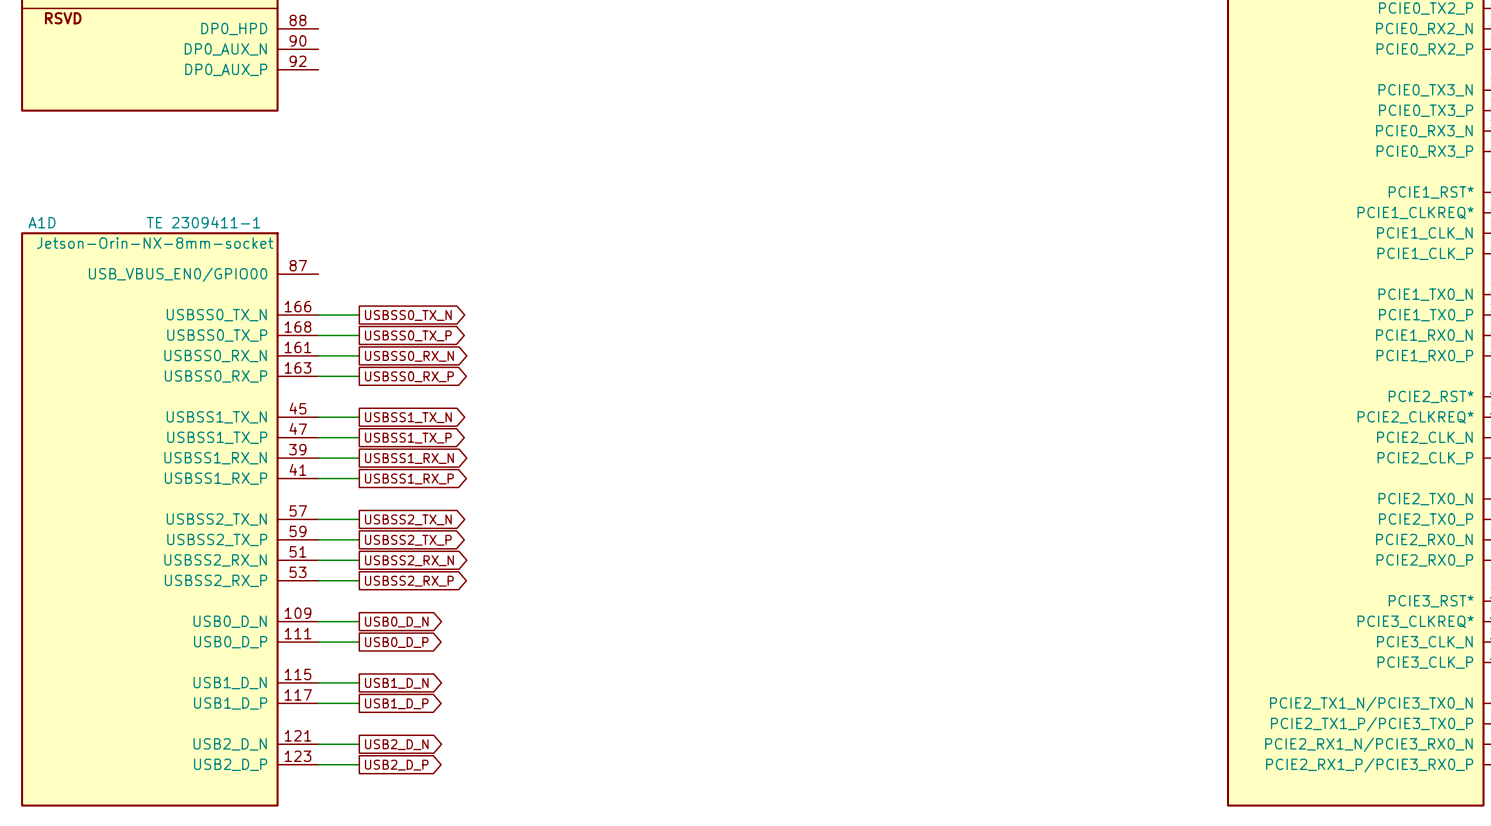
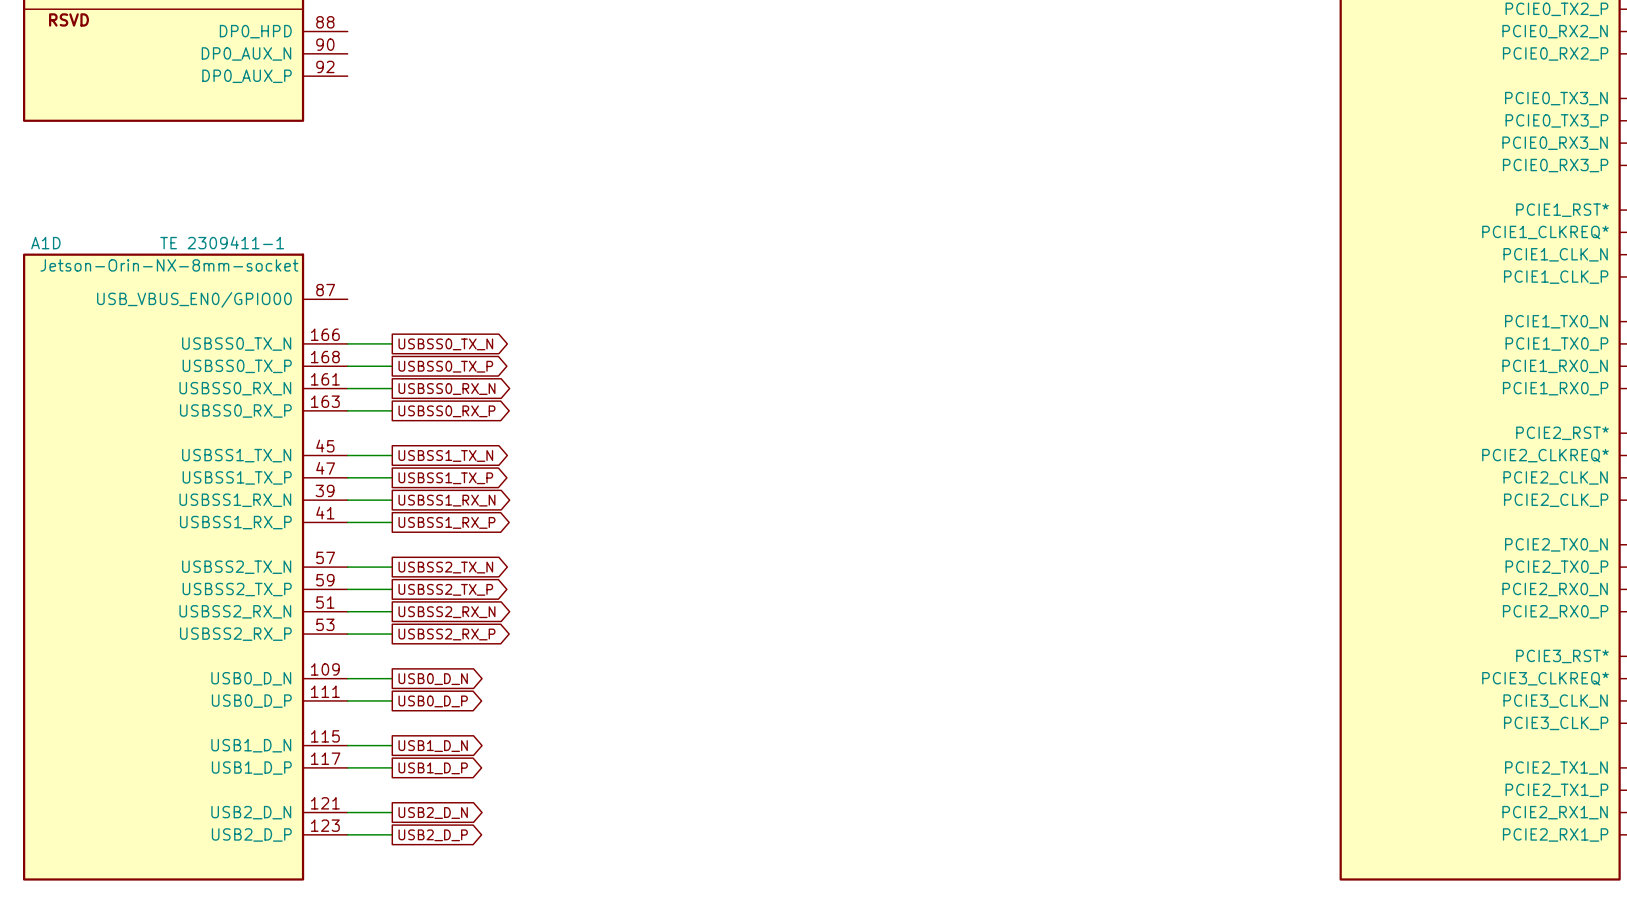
part pin name: PCIE2_TX1_N/PCIE3_TX0_N (1371, 703) -> PCIE2_TX1_N (1556, 768)
part pin name: PCIE2_TX1_P/PCIE3_TX0_P (1372, 724) -> PCIE2_TX1_P (1556, 790)
part pin name: PCIE2_RX1_N/PCIE3_RX0_N (1368, 744) -> PCIE2_RX1_N (1555, 812)
part pin name: PCIE2_RX1_P/PCIE3_RX0_P (1369, 765) -> PCIE2_RX1_P (1555, 834)

